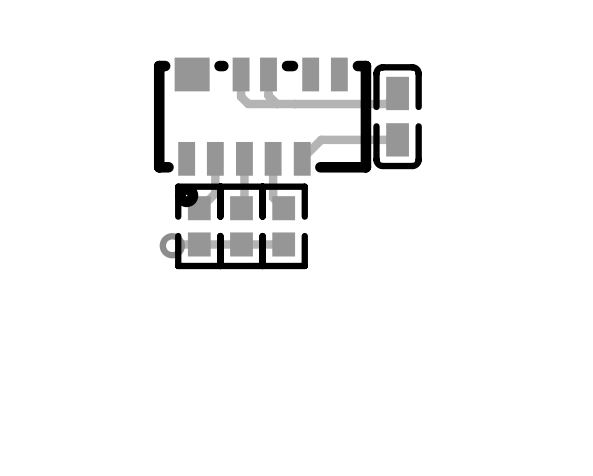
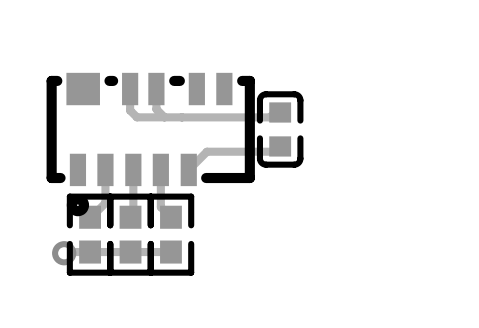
part footprint: [373, 64, 422, 170] -> [256, 91, 304, 168]

